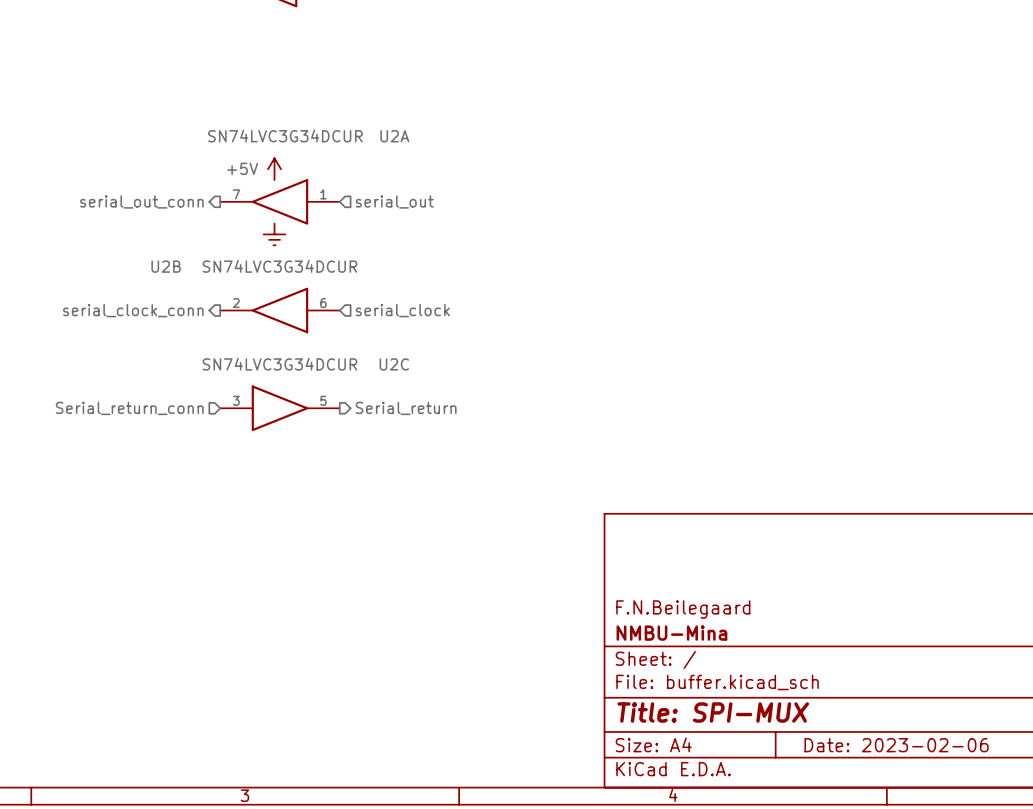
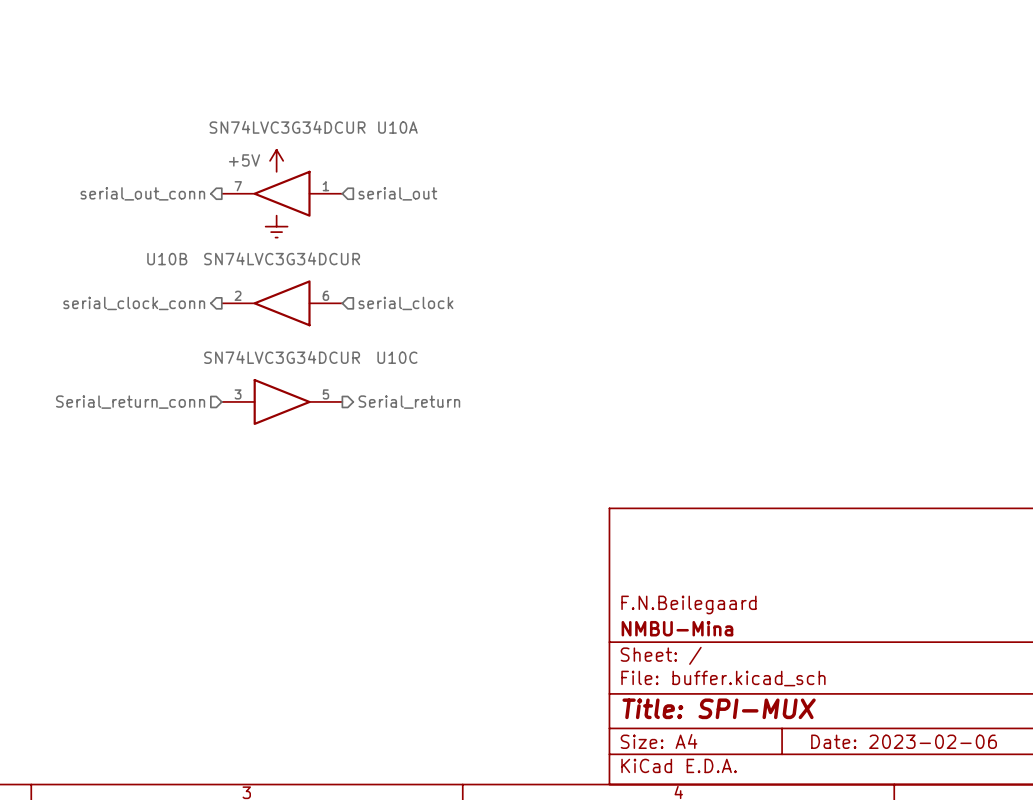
U2A name: U2A (394, 136) -> U10A (397, 127)
U2B name: U2B (166, 266) -> U10B (167, 259)
U2C name: U2C (394, 364) -> U10C (397, 357)

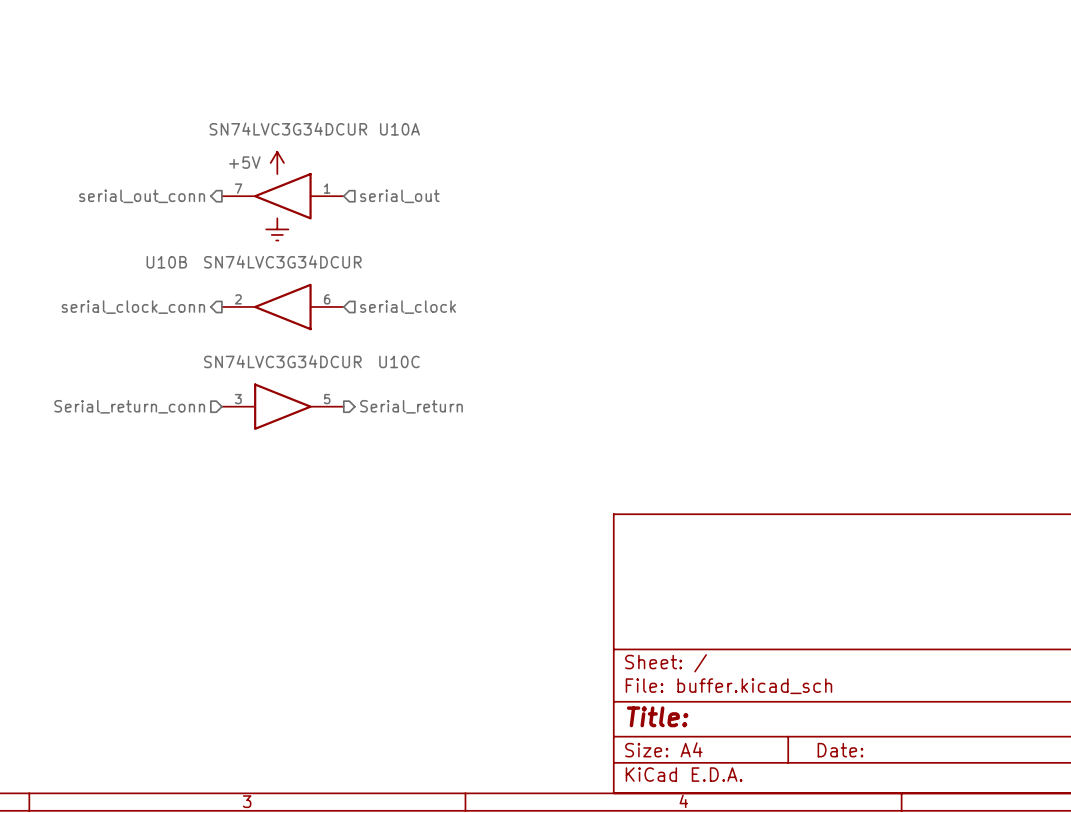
title block: F.N.Beilegaard (688, 604) -> none
title block: NMBU-Mina (677, 628) -> none
title block: Title: SPI-MUX (719, 708) -> Title: (657, 716)
title block: Date: 2023-02-06 (904, 741) -> Date: (840, 750)

